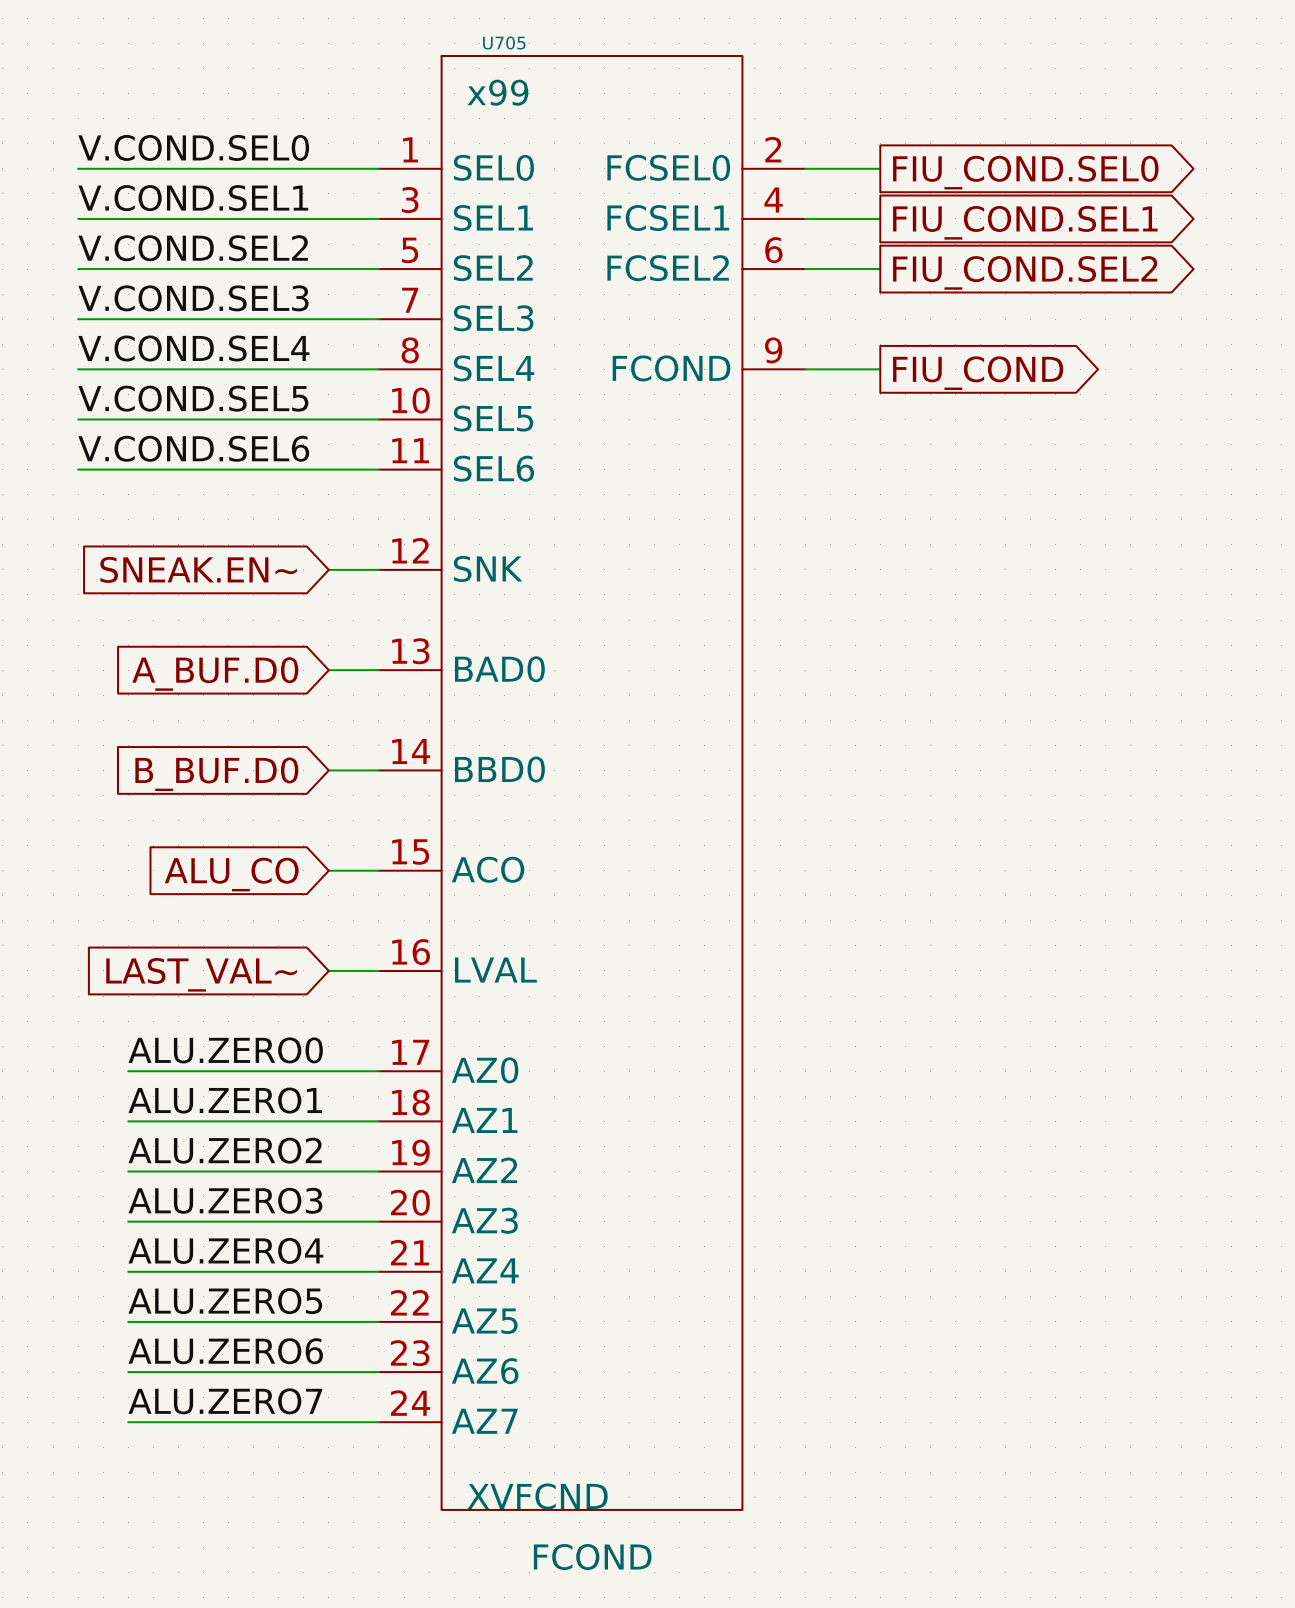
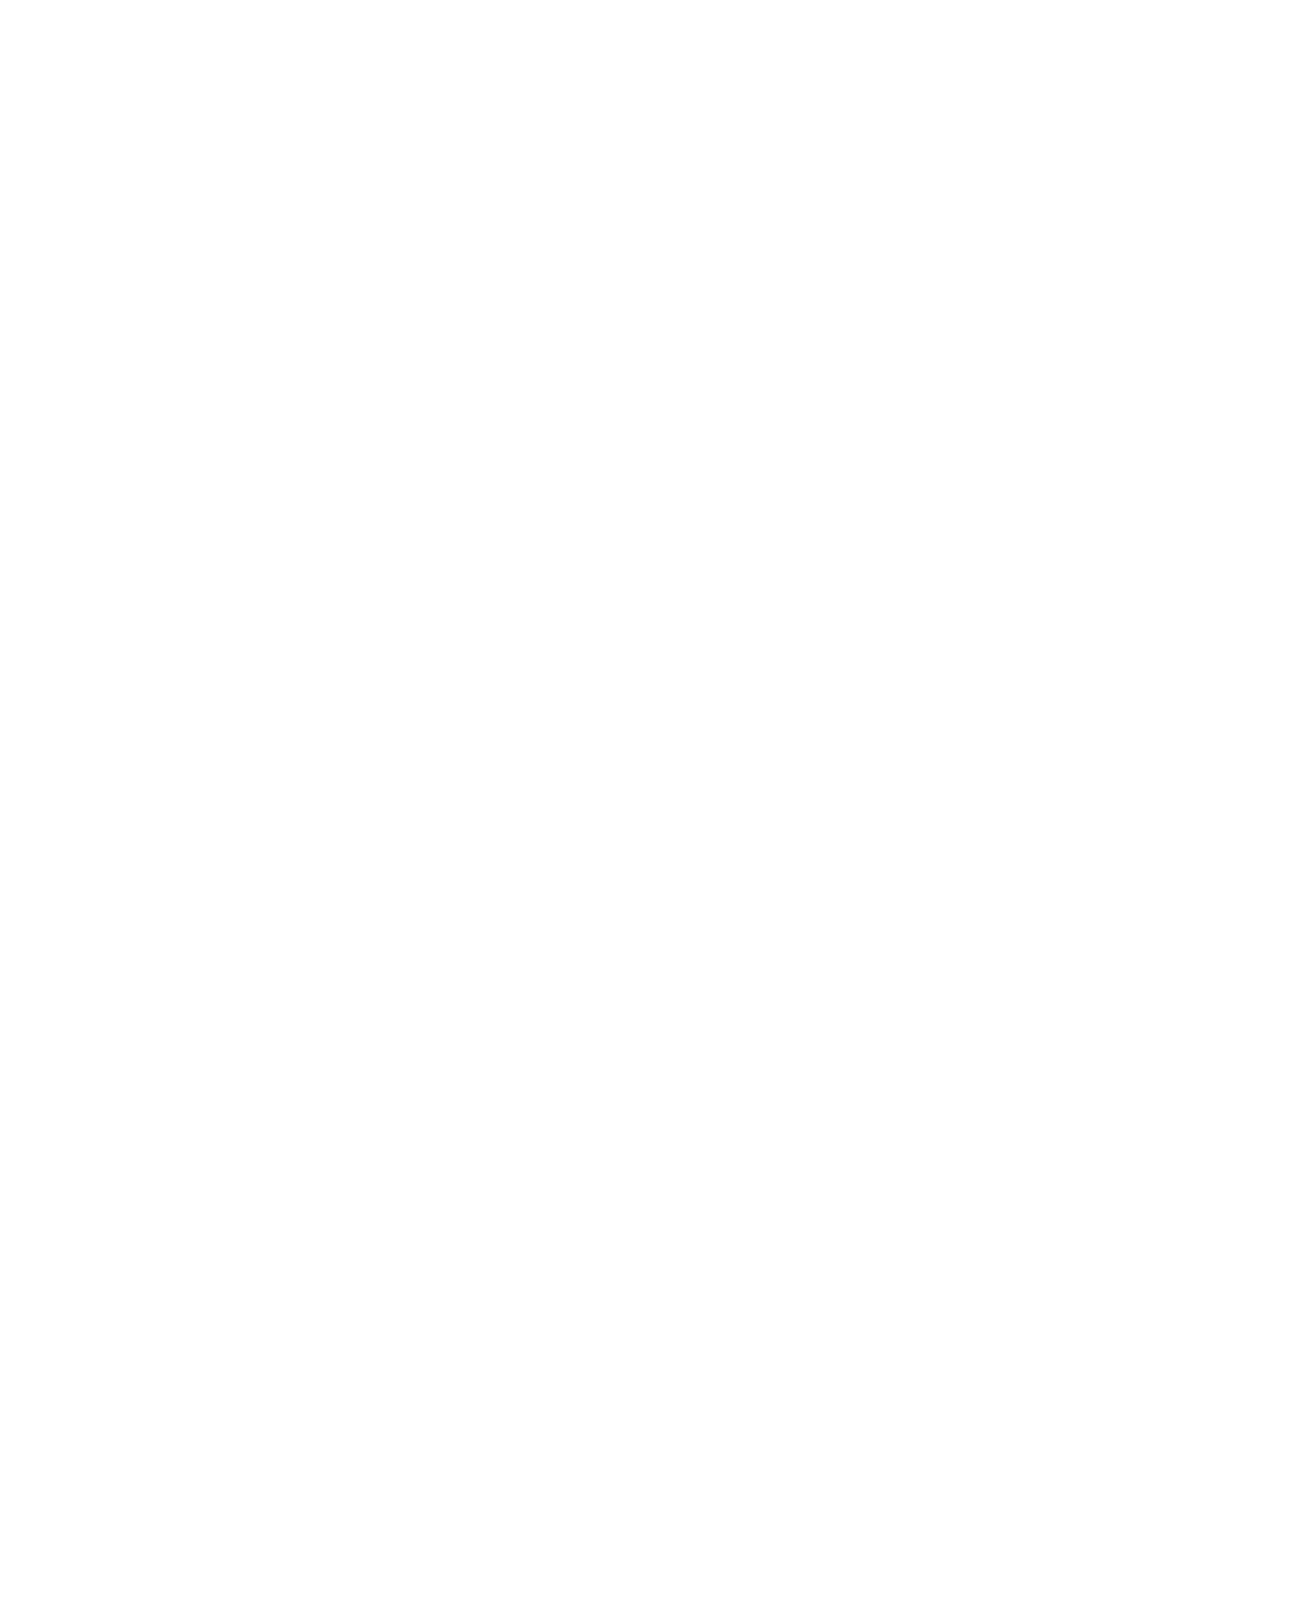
label: V.COND.SEL0 (193, 147) -> none
wire: (78, 168) (378, 168) -> none
wire: (805, 168) (880, 168) -> none
global label: FIU_COND.SEL0 (1025, 172) -> none
label: V.COND.SEL1 (193, 198) -> none
wire: (78, 218) (378, 218) -> none
wire: (805, 218) (880, 218) -> none
global label: FIU_COND.SEL1 (1025, 222) -> none
label: V.COND.SEL2 (193, 248) -> none
wire: (78, 269) (378, 269) -> none
wire: (805, 269) (880, 269) -> none
global label: FIU_COND.SEL2 (1025, 272) -> none
label: V.COND.SEL3 (193, 298) -> none
wire: (78, 319) (378, 319) -> none
label: V.COND.SEL4 (193, 348) -> none
wire: (78, 369) (378, 369) -> none
wire: (805, 369) (880, 369) -> none
global label: FIU_COND (978, 373) -> none
label: V.COND.SEL5 (193, 398) -> none
wire: (78, 419) (378, 419) -> none
label: V.COND.SEL6 (193, 448) -> none
wire: (78, 469) (378, 469) -> none
global label: SNEAK.EN~ (198, 569) -> none
wire: (328, 569) (378, 569) -> none
wire: (328, 670) (378, 670) -> none
global label: A_BUF.D0 (215, 673) -> none
wire: (328, 770) (378, 770) -> none
global label: B_BUF.D0 (216, 774) -> none
U705: XVFCND (592, 782) -> none
wire: (328, 870) (378, 870) -> none
global label: ALU_CO (231, 874) -> none
wire: (328, 970) (378, 970) -> none
global label: LAST_VAL~ (201, 974) -> none
label: ALU.ZERO0 (225, 1050) -> none
wire: (128, 1071) (378, 1071) -> none
label: ALU.ZERO1 (225, 1100) -> none
wire: (128, 1121) (378, 1121) -> none
label: ALU.ZERO2 (225, 1150) -> none
wire: (128, 1171) (378, 1171) -> none
label: ALU.ZERO3 (225, 1200) -> none
wire: (128, 1221) (378, 1221) -> none
label: ALU.ZERO4 (225, 1250) -> none
wire: (128, 1271) (378, 1271) -> none
label: ALU.ZERO5 (225, 1301) -> none
wire: (128, 1321) (378, 1321) -> none
label: ALU.ZERO6 (225, 1351) -> none
wire: (128, 1372) (378, 1372) -> none
label: ALU.ZERO7 (225, 1401) -> none
wire: (128, 1422) (378, 1422) -> none

